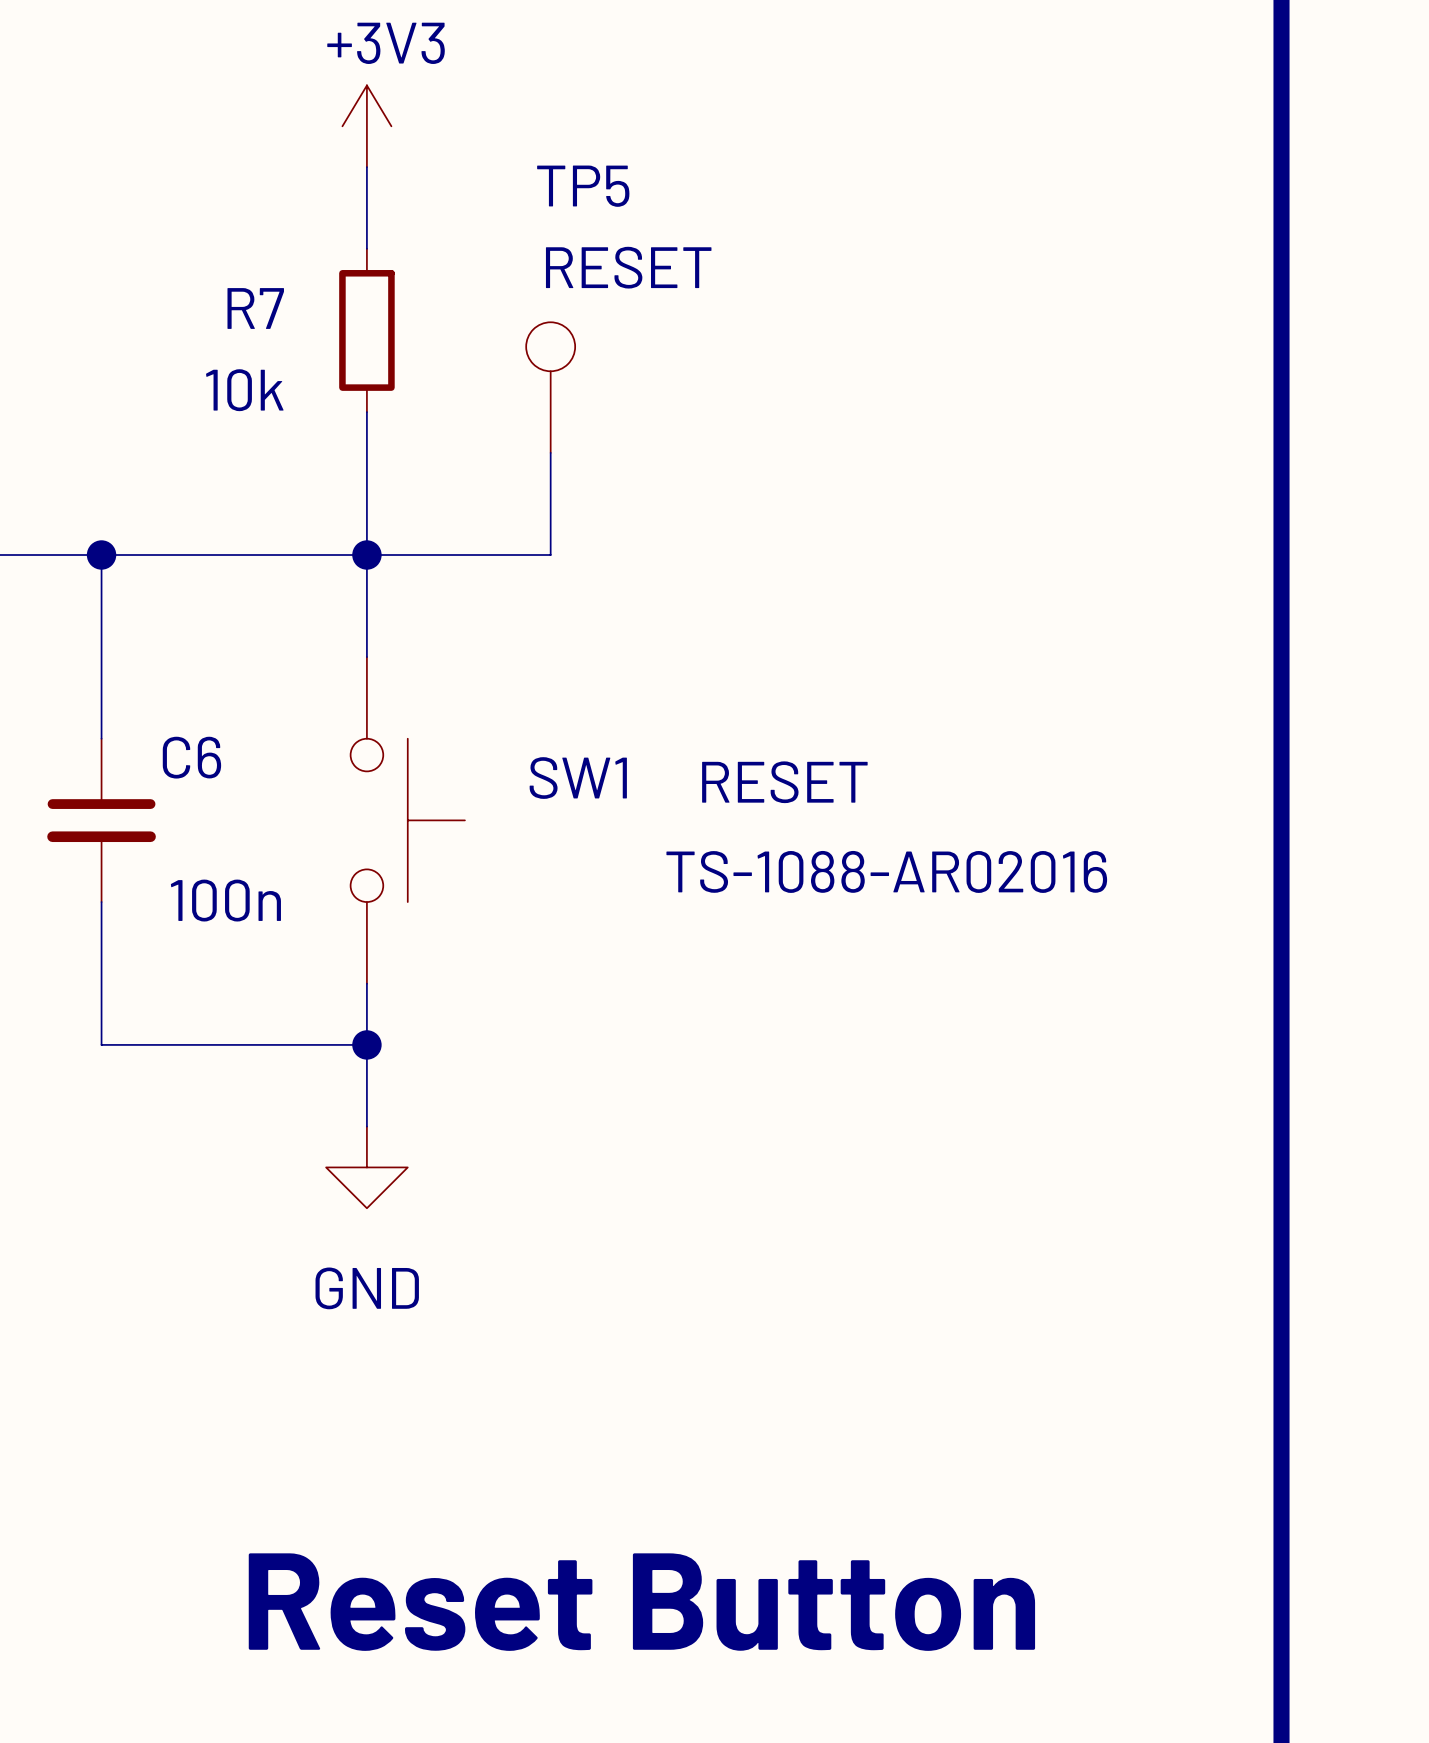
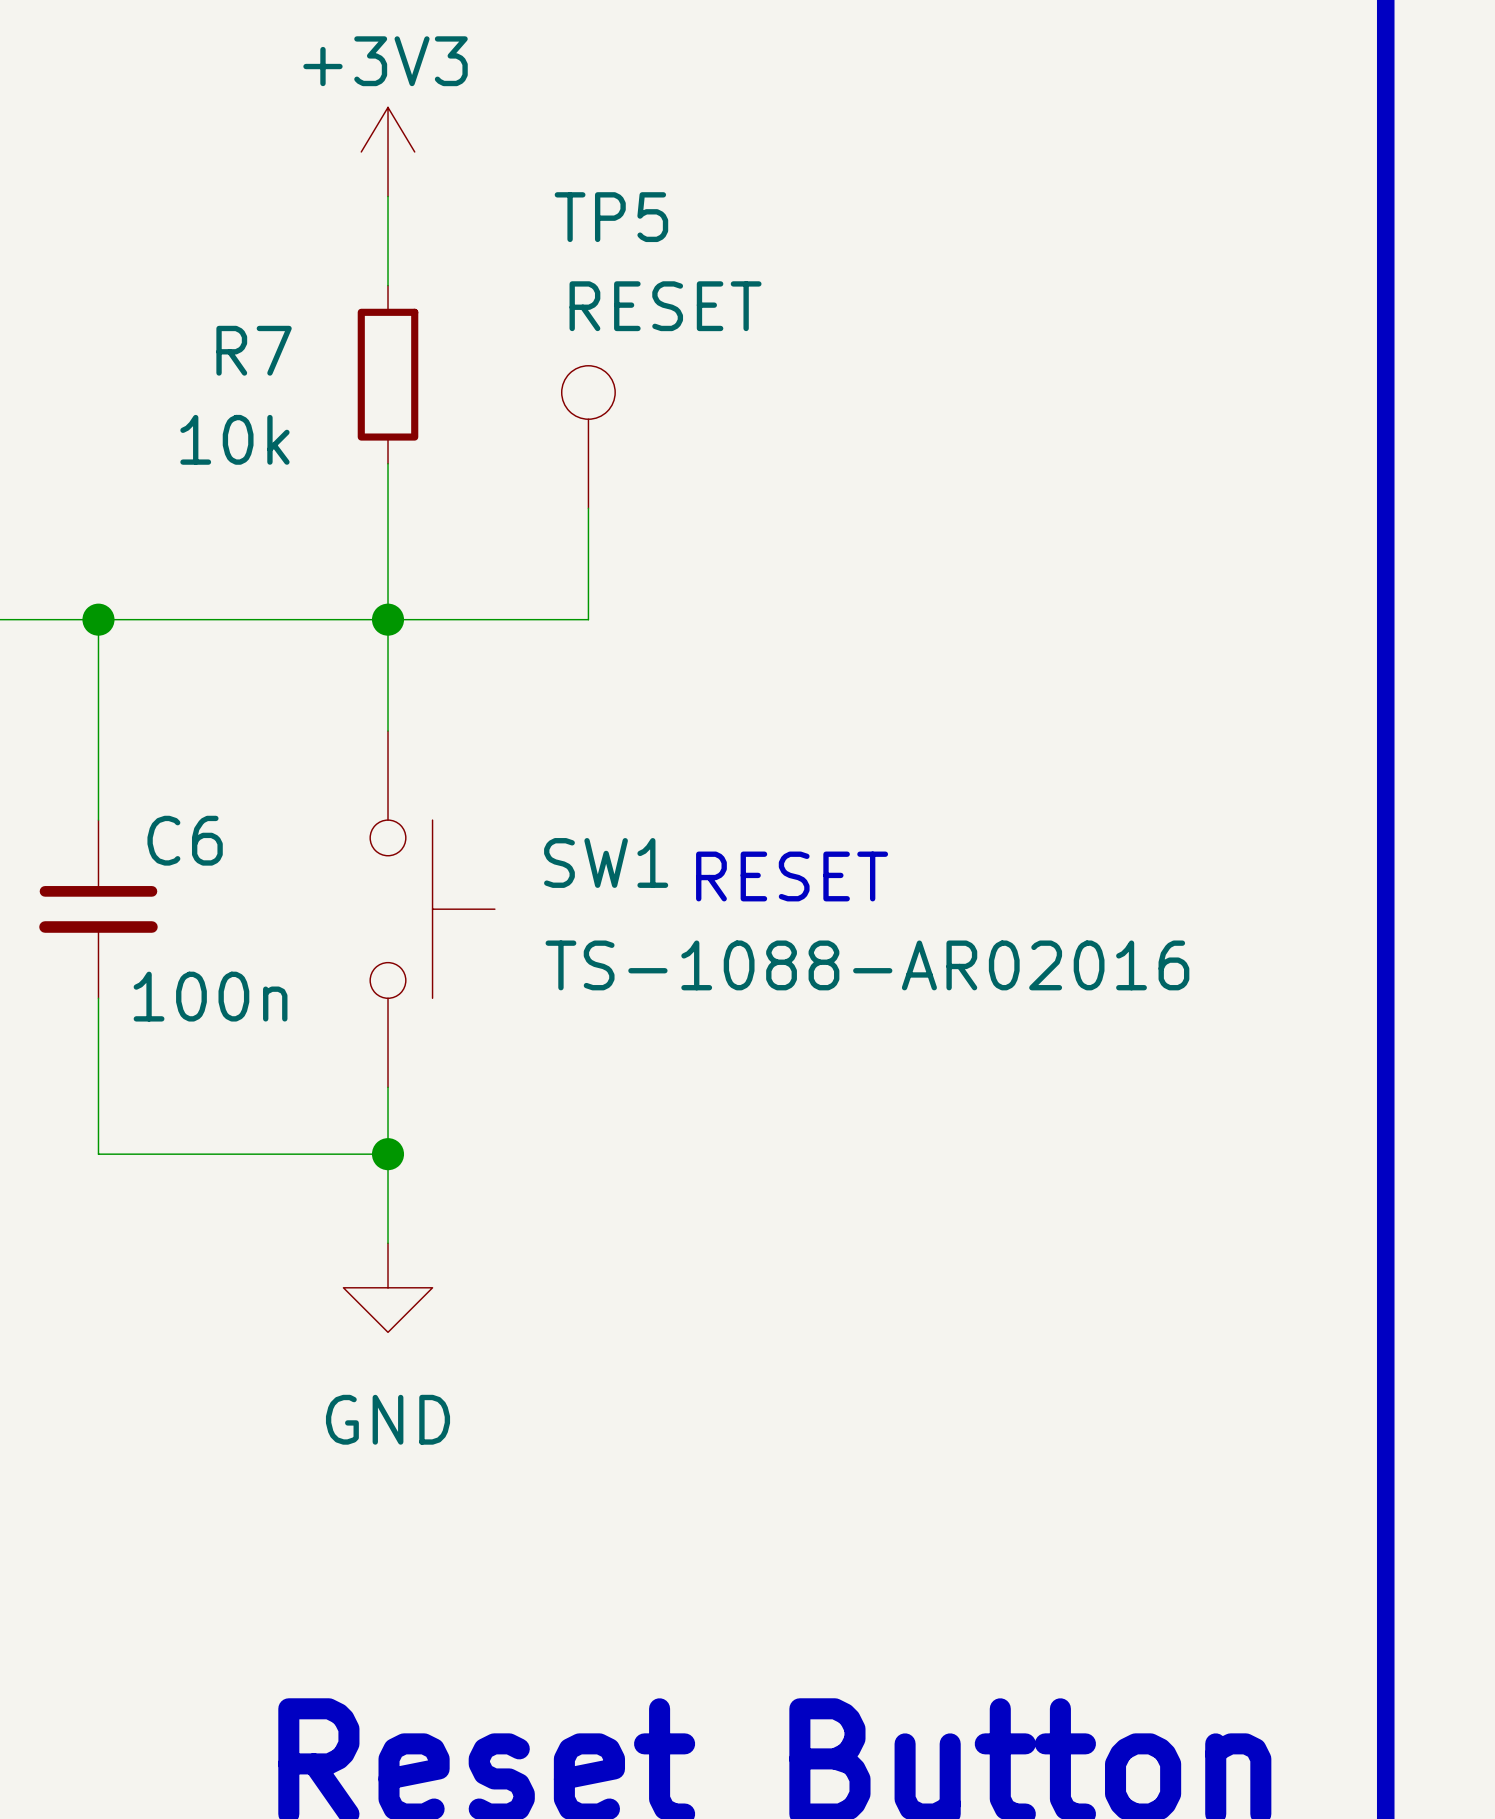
text position: RESET (784, 782) -> RESET (792, 876)

